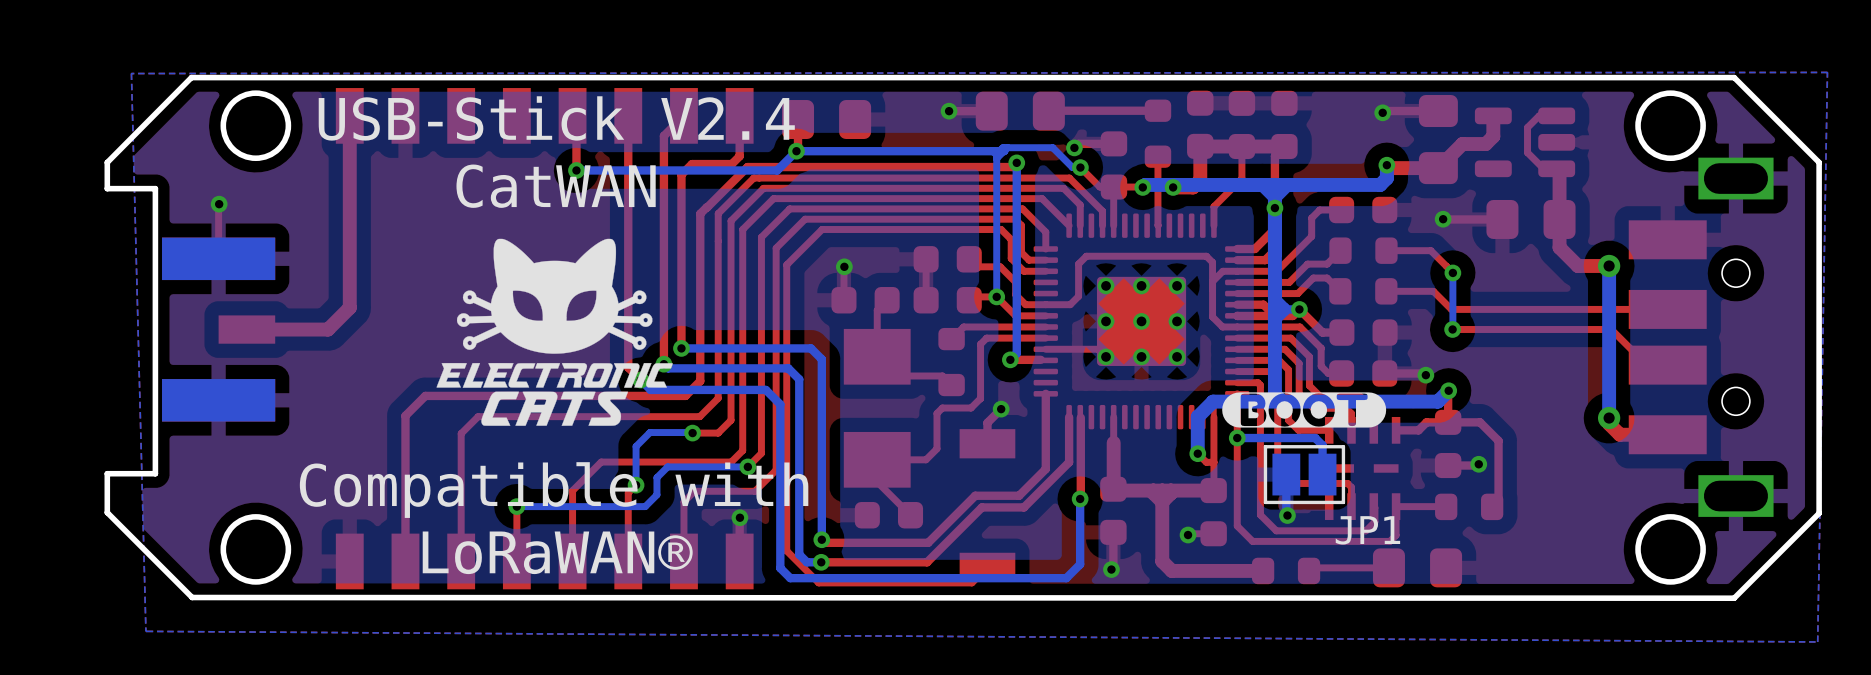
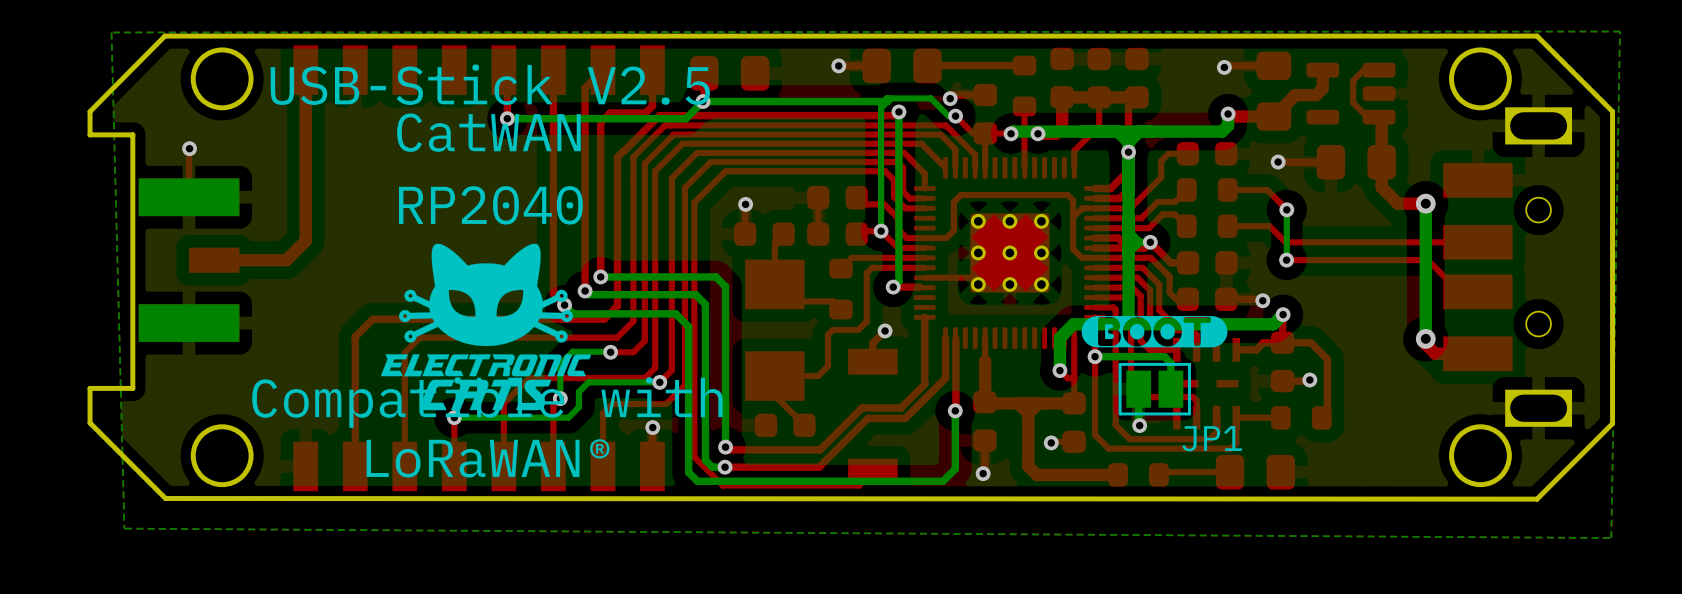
text: USB-Stick V2.4 (556, 118) -> USB-Stick V2.5 (490, 84)
text: none -> RP2040 (490, 205)
drawing position: (554, 332) -> (486, 327)

